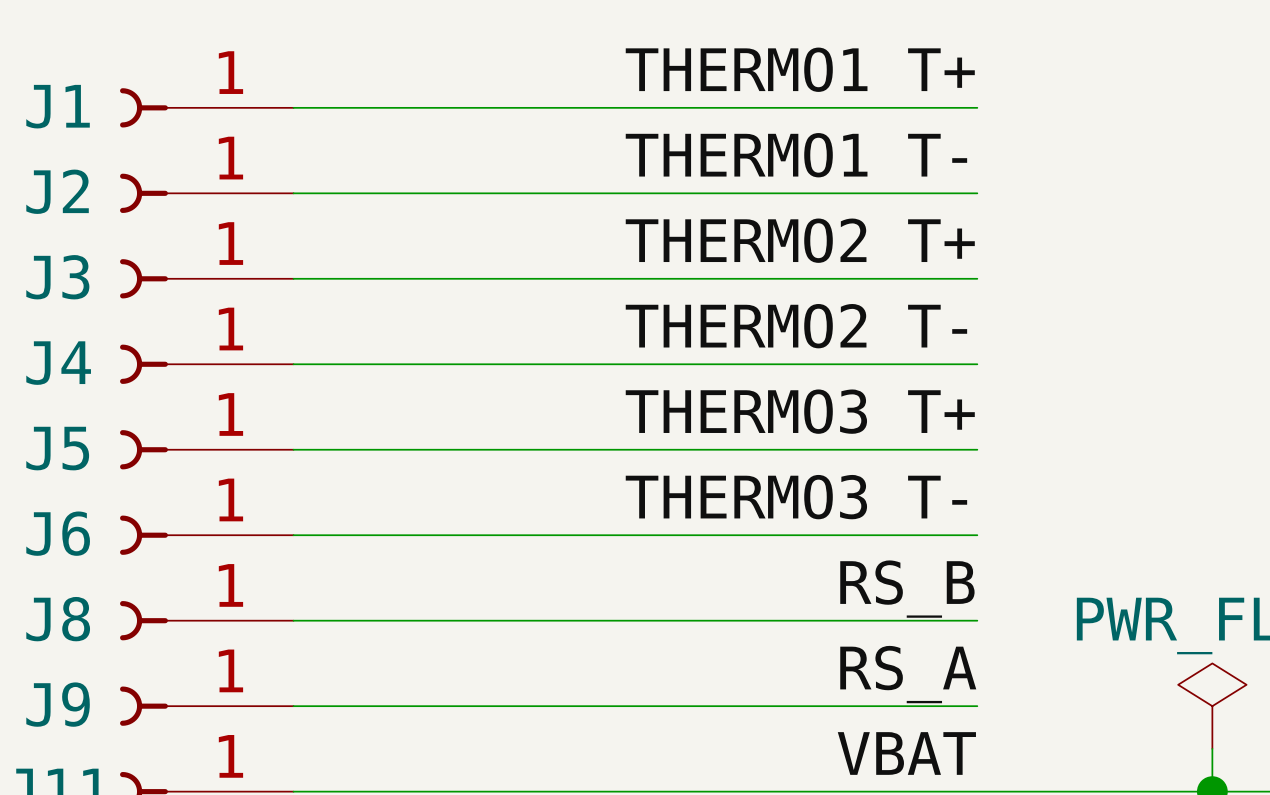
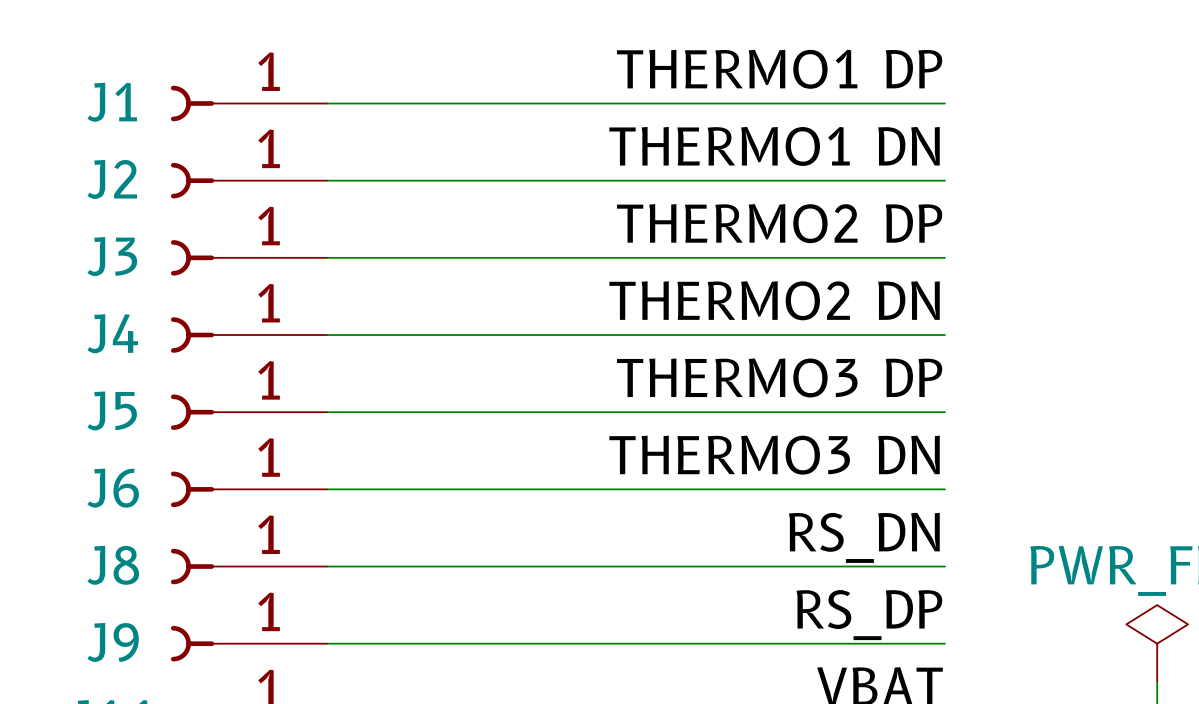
label: THERMO1 T+ (800, 69) -> THERMO1 DP (779, 69)
label: THERMO1 T- (796, 155) -> THERMO1 DN (774, 146)
label: THERMO2 T+ (800, 240) -> THERMO2 DP (779, 223)
label: THERMO2 T- (796, 326) -> THERMO2 DN (774, 300)
label: THERMO3 T+ (800, 411) -> THERMO3 DP (779, 377)
label: THERMO3 T- (796, 497) -> THERMO3 DN (774, 455)
label: RS_B (907, 589) -> RS_DN (864, 537)
label: RS_A (908, 674) -> RS_DP (869, 615)

